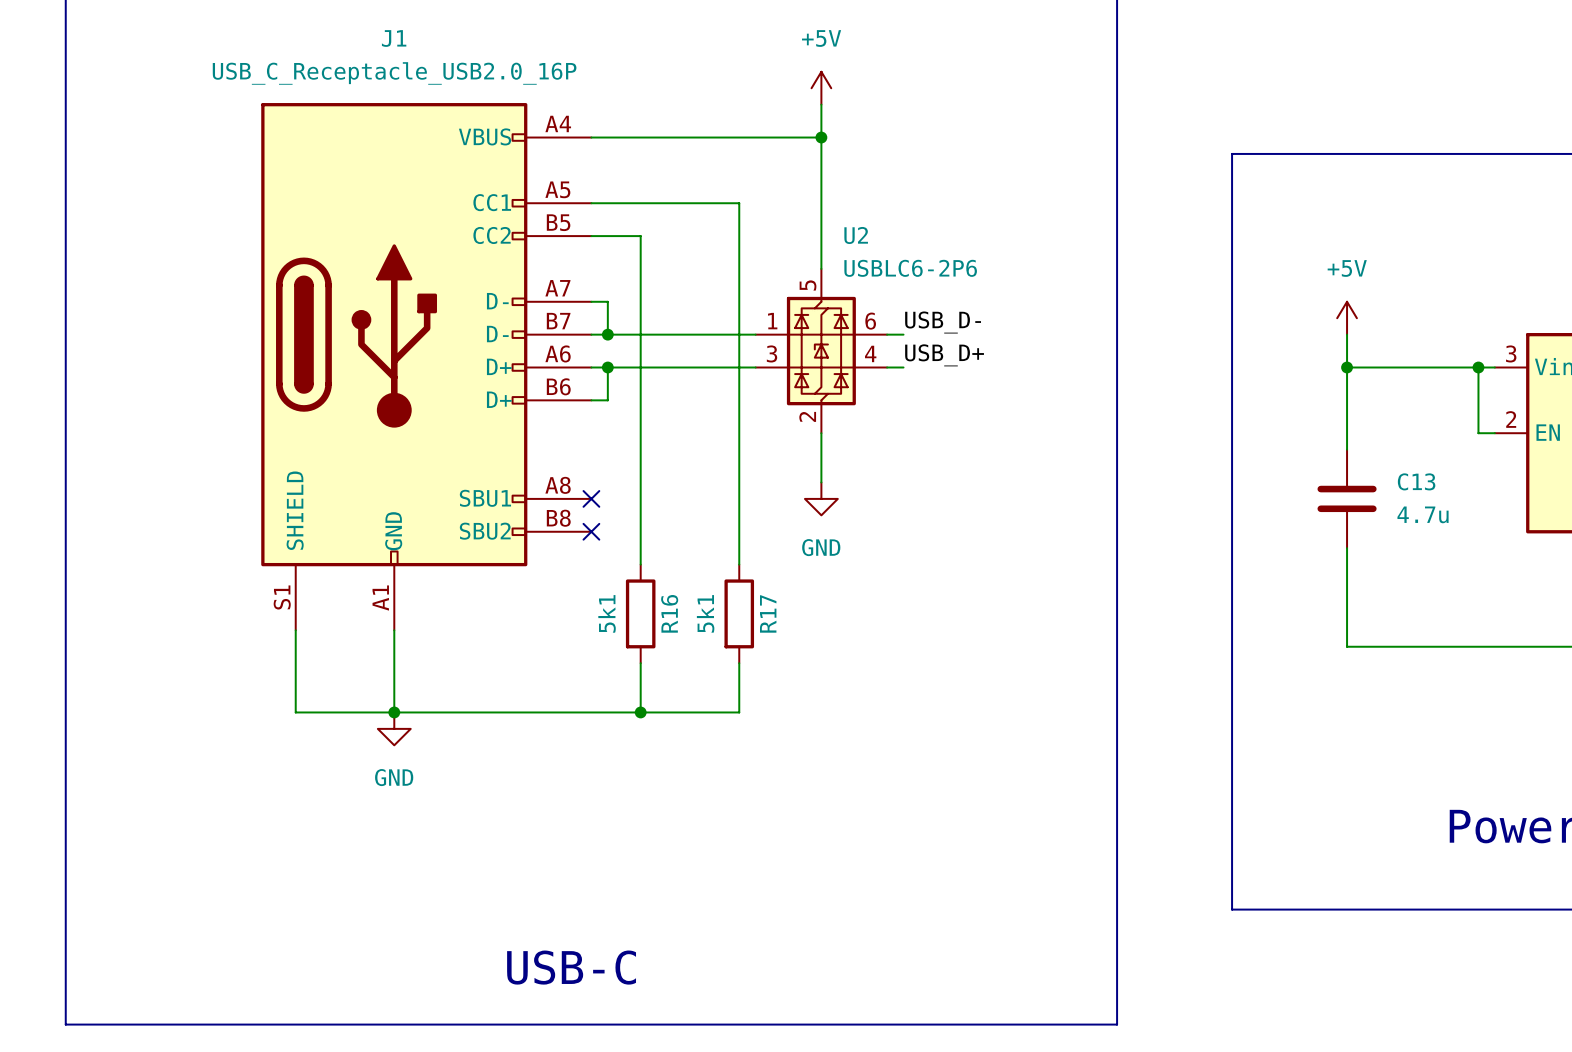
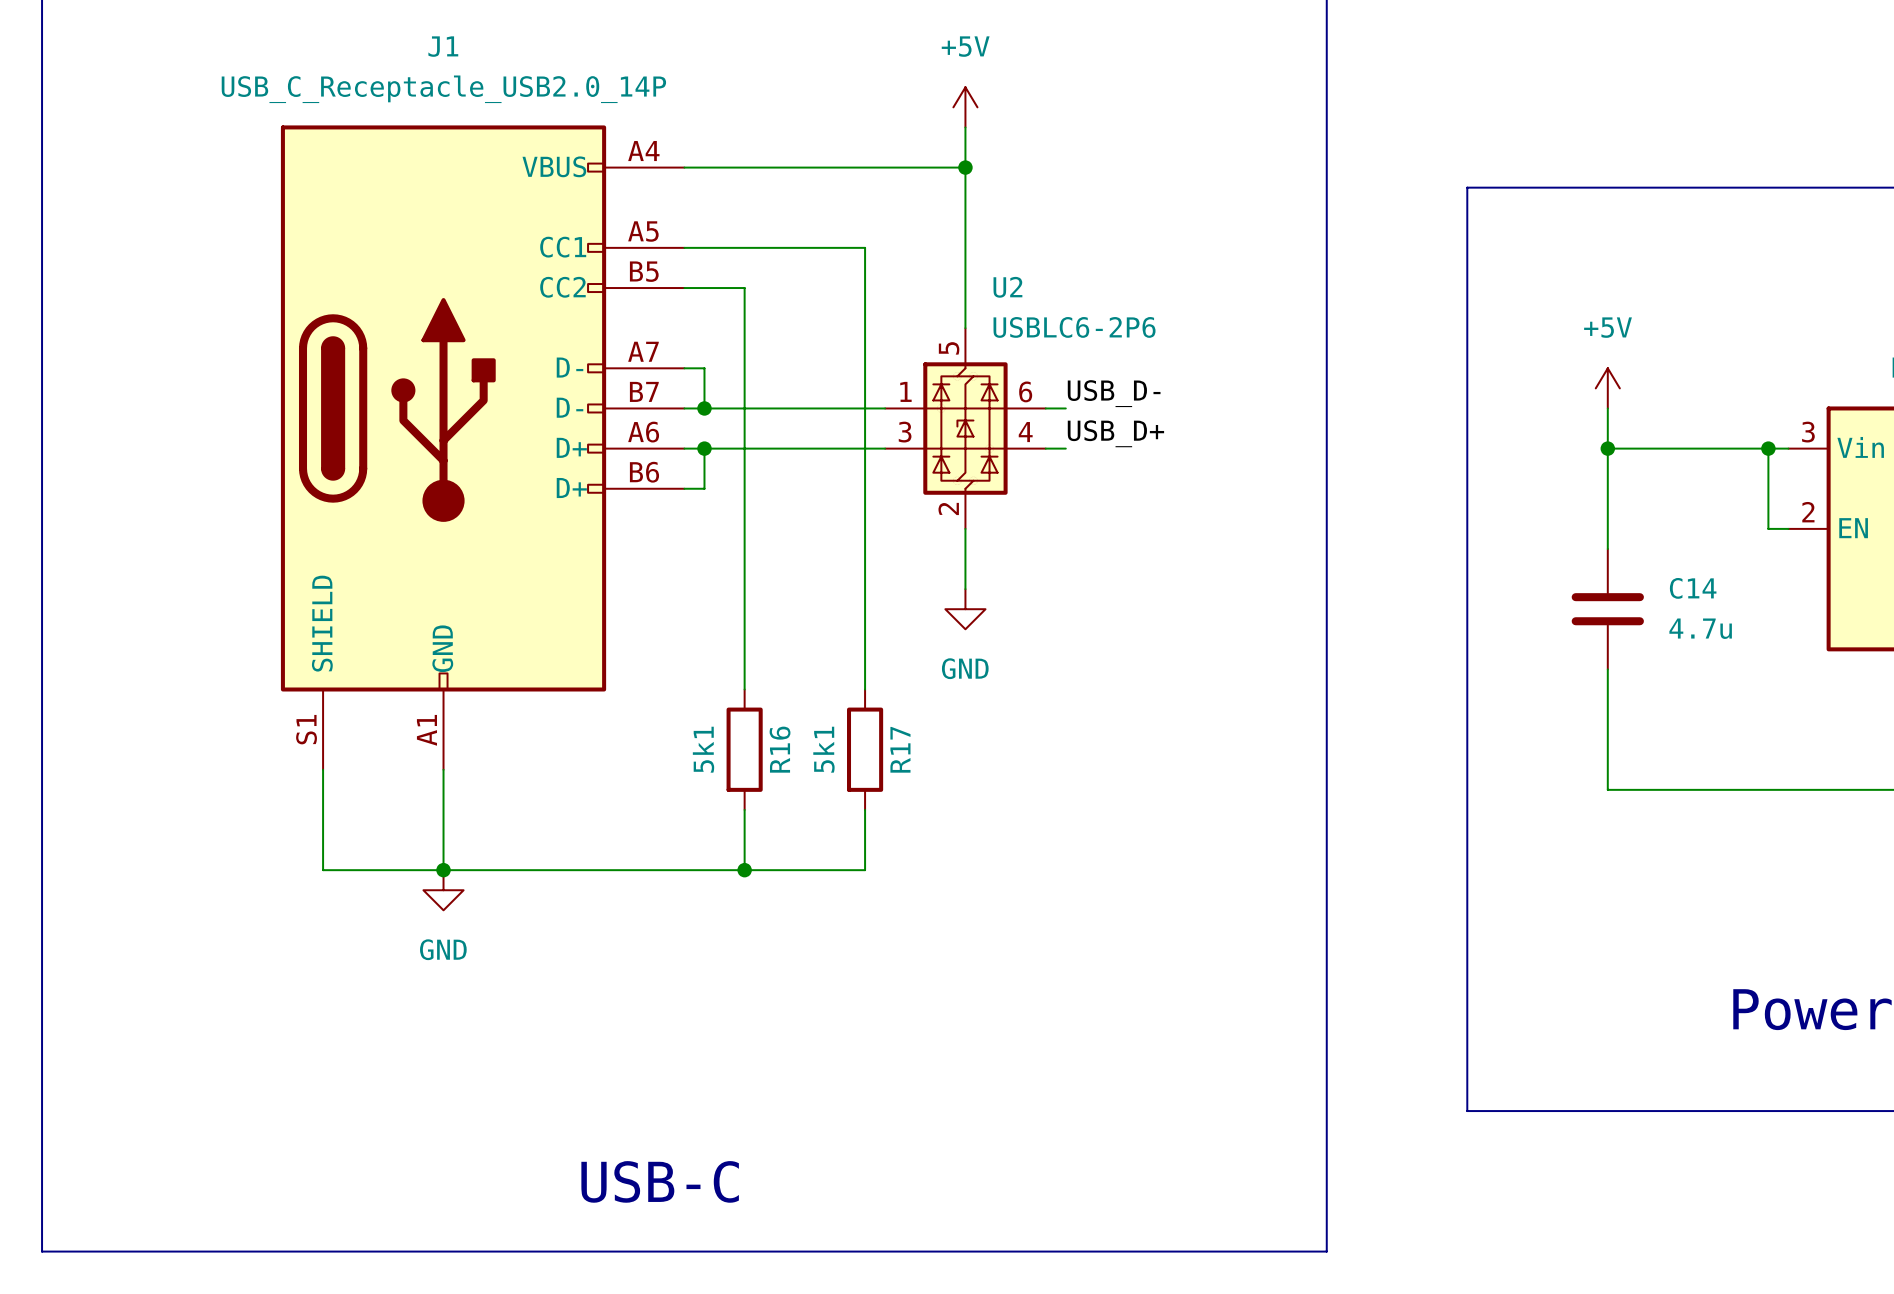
J1 value: USB_C_Receptacle_USB2.0_16P (394, 73) -> USB_C_Receptacle_USB2.0_14P (443, 89)
J1 symbol: [261, 103, 592, 631] -> [280, 125, 685, 770]
C13 name: C13 (1416, 481) -> C14 (1693, 588)
no-connect mark: (591, 498) -> none
no-connect mark: (591, 531) -> none

